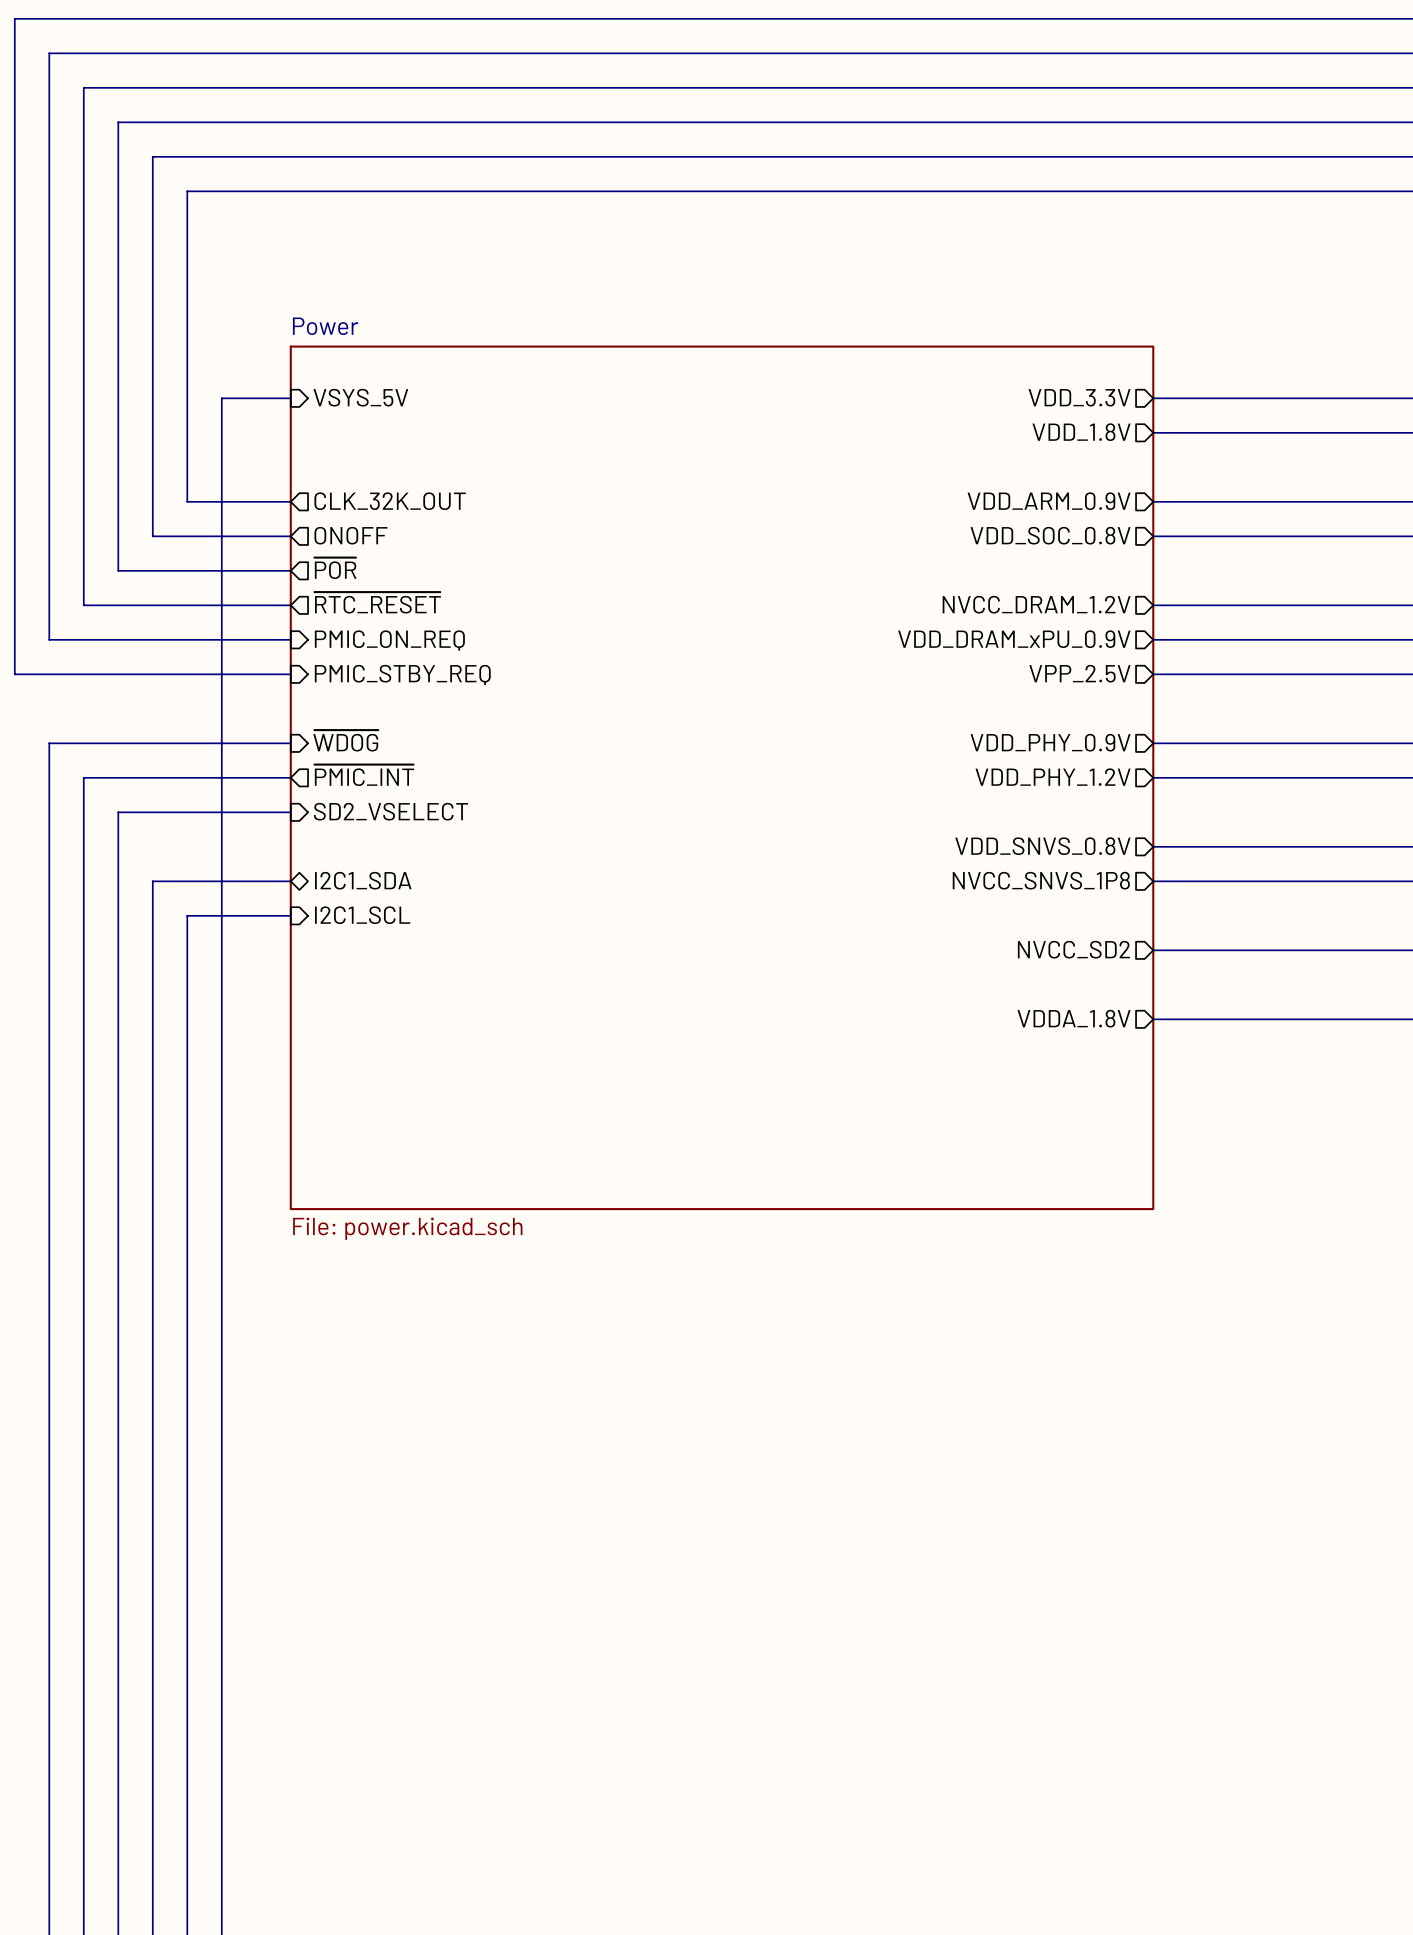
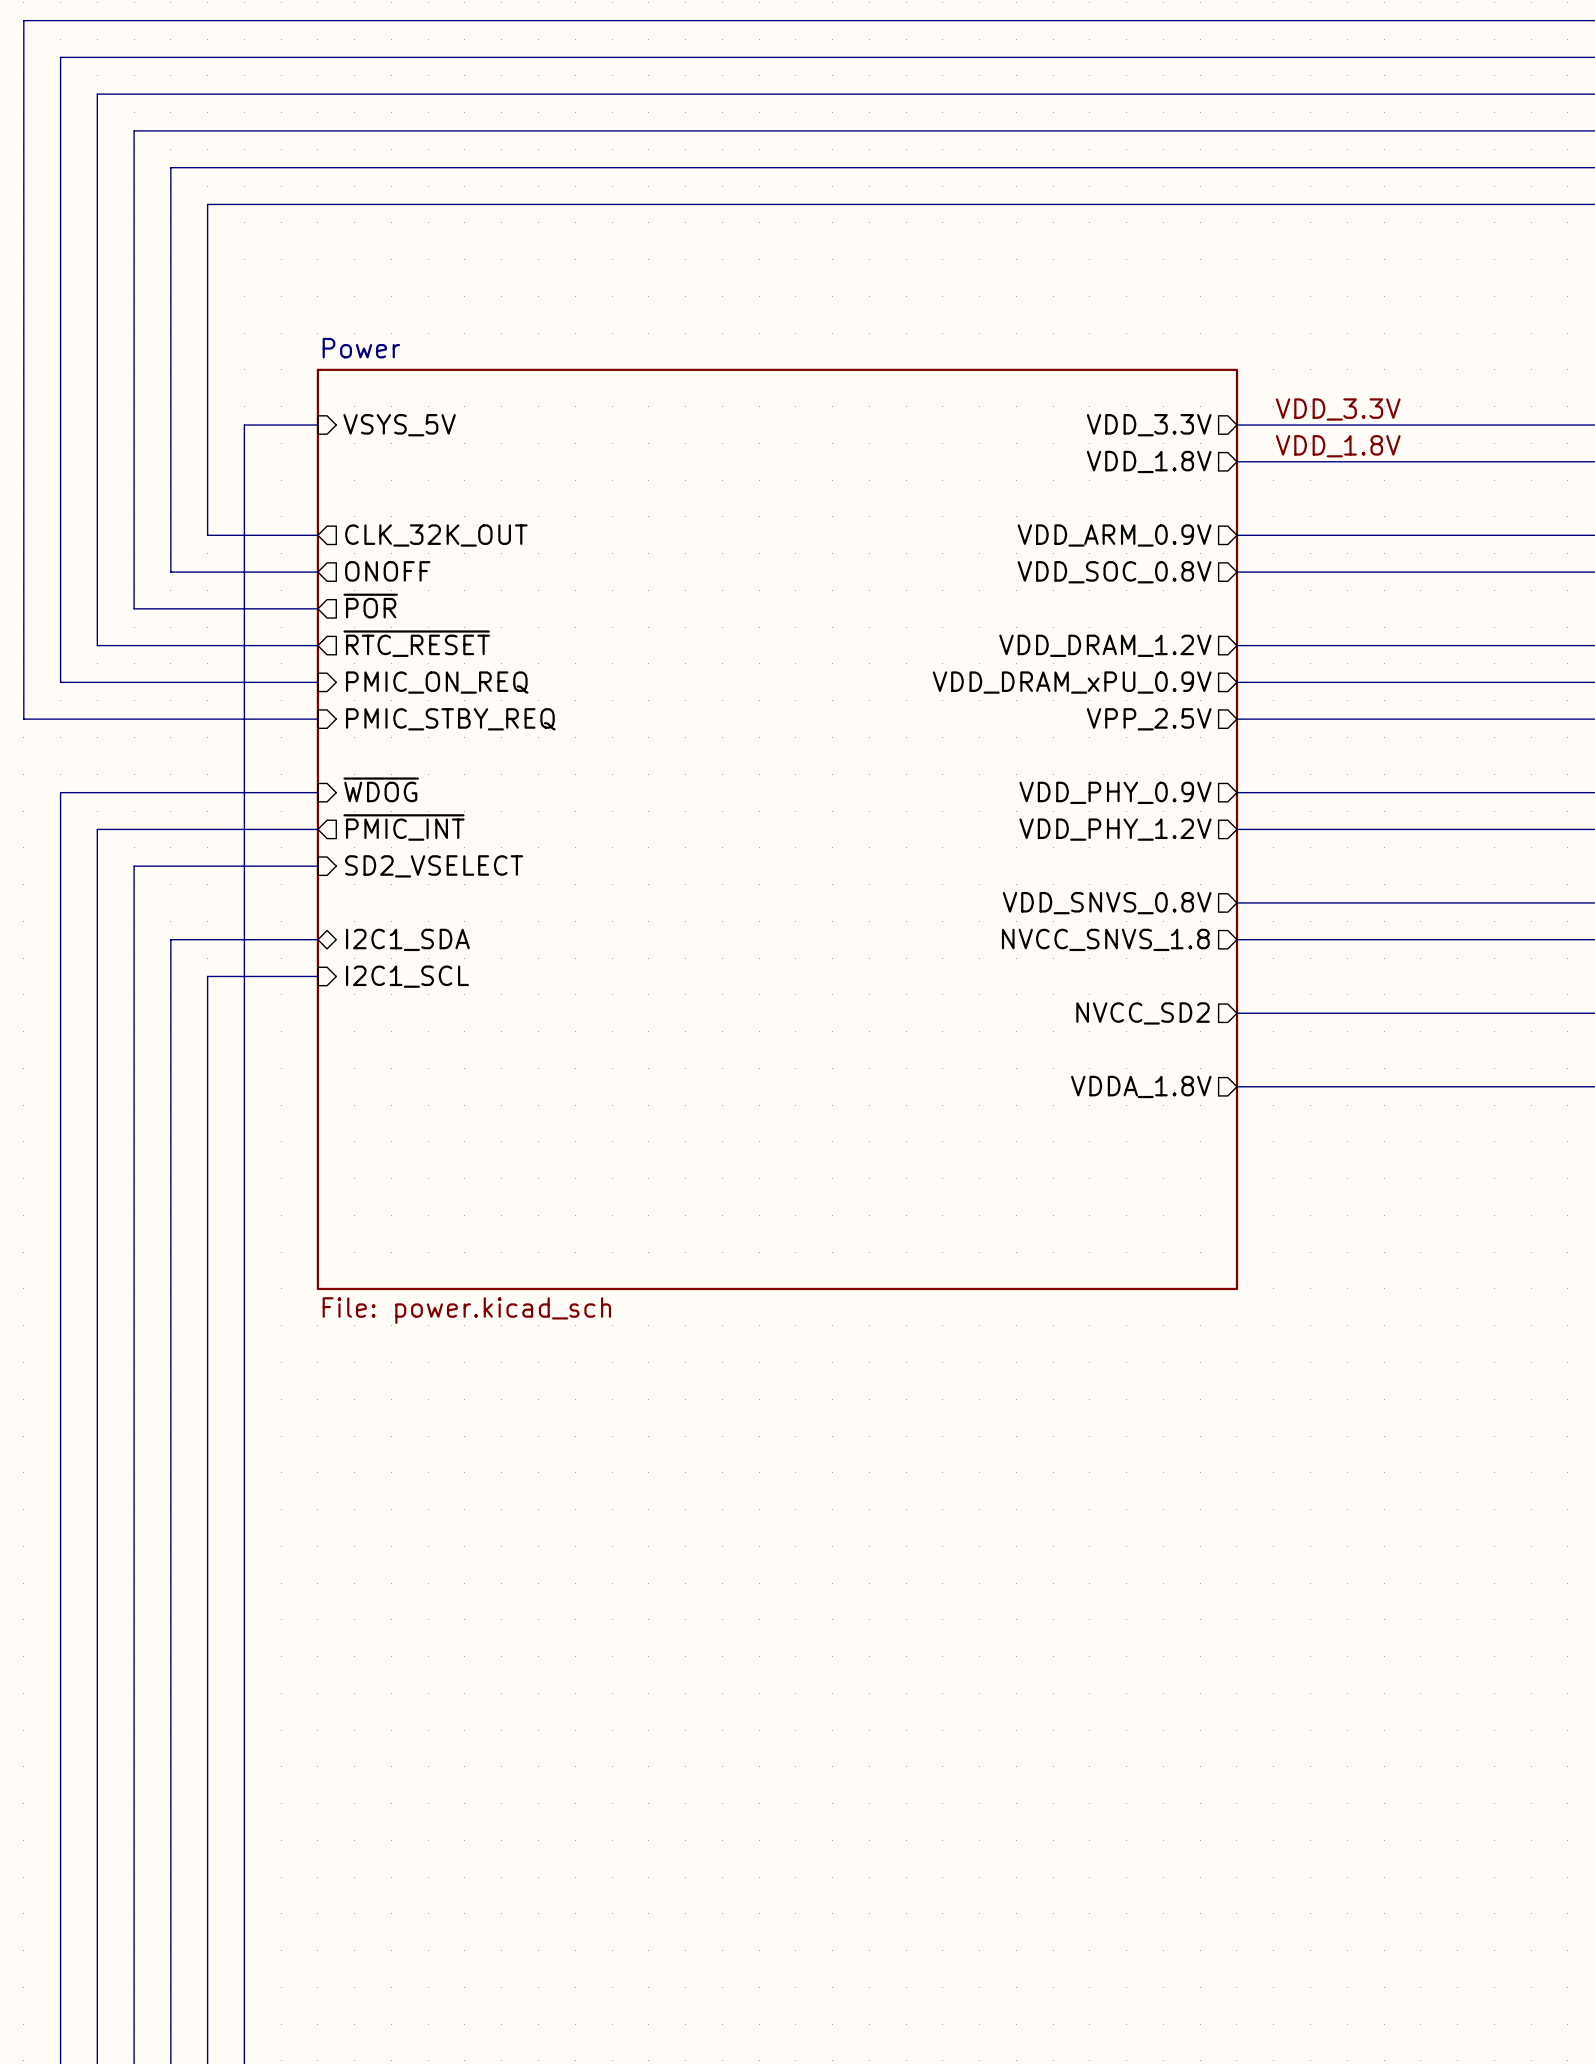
label: none -> VDD_3.3V (1338, 409)
label: none -> VDD_1.8V (1338, 446)
sheet pin: NVCC_DRAM_1.2V (1036, 604) -> VDD_DRAM_1.2V (1105, 645)
sheet pin: NVCC_SNVS_1P8 (1041, 880) -> NVCC_SNVS_1.8 (1105, 939)

